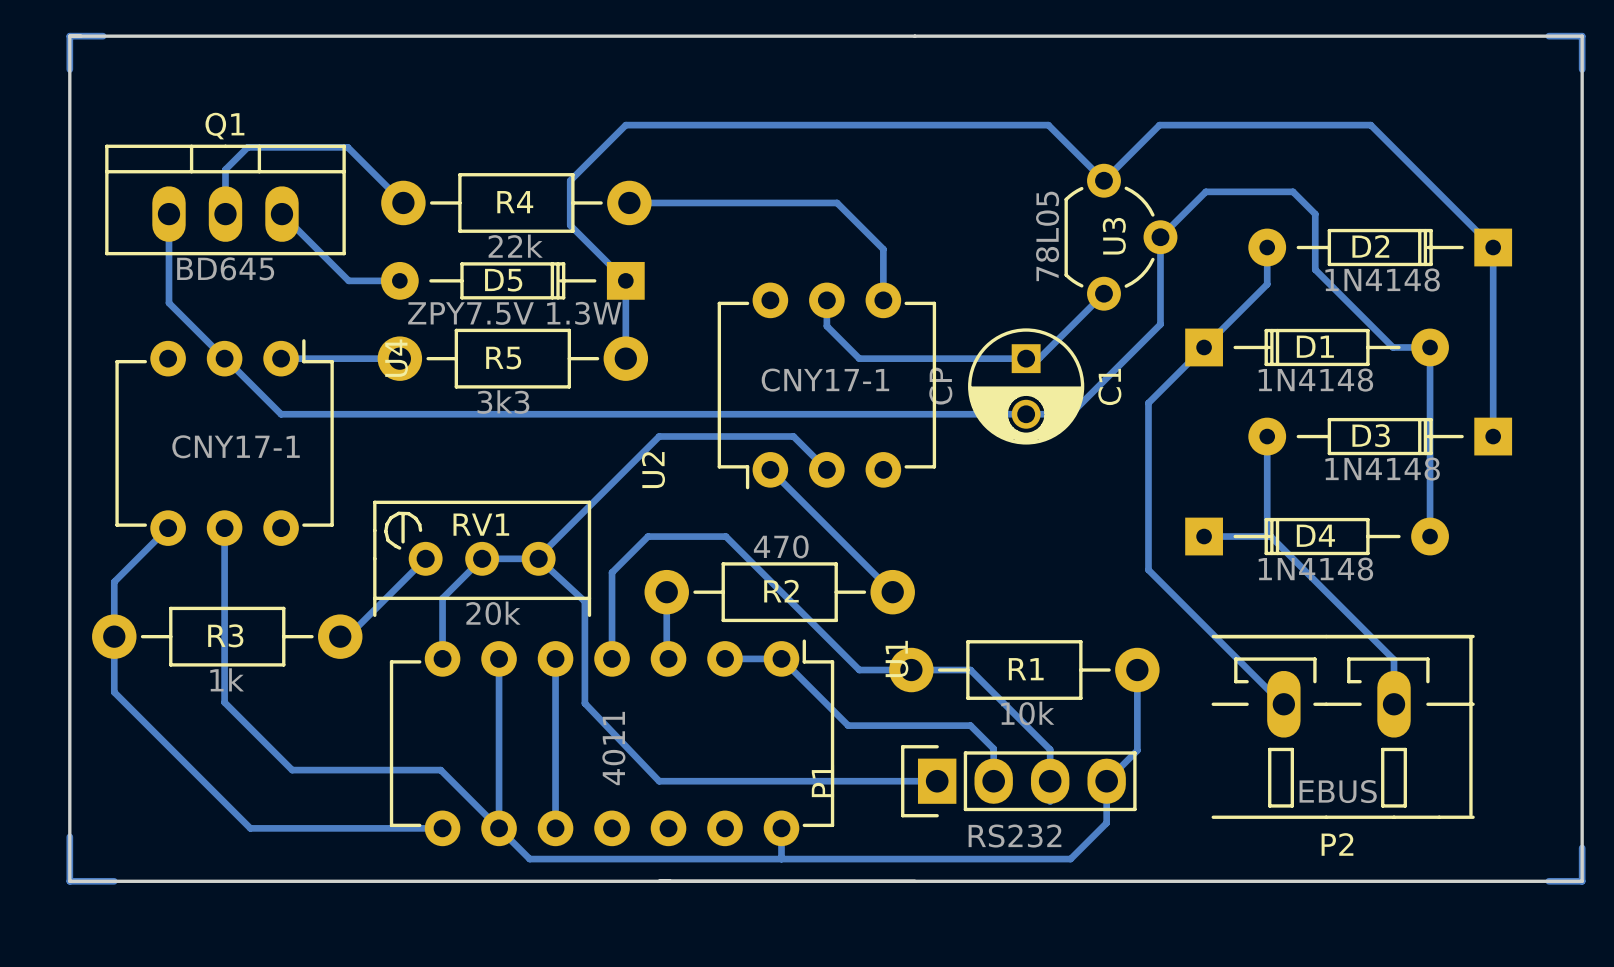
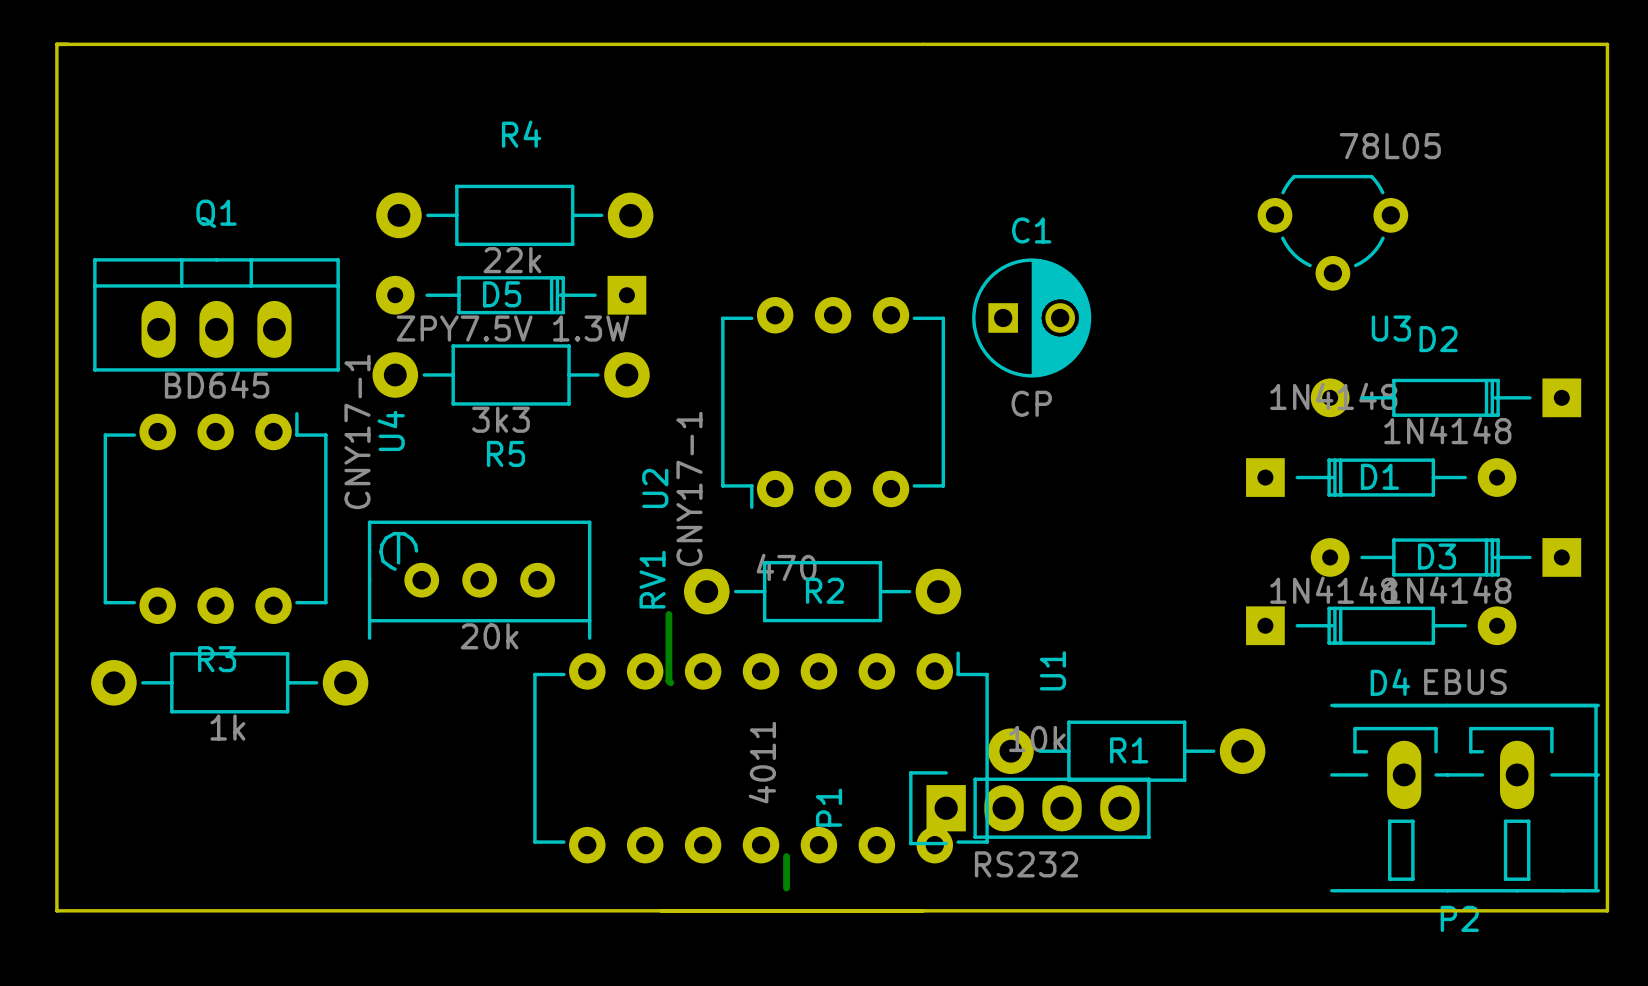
bottom track: (103, 36) (69, 36) (69, 69) -> none
bottom track: (1548, 36) (1582, 36) (1582, 69) -> none
Q1 name position: Q1 (224, 126) -> Q1 (216, 213)
Q1 position: (225, 199) -> (216, 314)
bottom track: (403, 202) (347, 147) (247, 147) (225, 169) (225, 214) -> none
R4 name position: R4 (515, 202) -> R4 (521, 134)
bottom track: (629, 202) (837, 202) (883, 249) (883, 300) -> none
bottom track: (169, 214) (169, 303) (281, 414) (1070, 414) (1160, 324) (1160, 237) (1205, 191) (1293, 191) (1315, 214) (1315, 269) (1393, 347) (1430, 347) (1430, 536) -> none
bottom track: (281, 214) (348, 280) (399, 280) -> none
U3 value position: 78L05 (1047, 236) -> 78L05 (1390, 146)
U3 name position: U3 (1114, 236) -> U3 (1391, 328)
U3 rotation: 0° (1120, 237) -> 90° clockwise (1332, 232)
U3 position: (1120, 237) -> (1332, 232)
D2 name position: D2 (1370, 246) -> D2 (1438, 339)
bottom track: (1267, 247) (1267, 284) (1148, 403) (1148, 569) (1283, 704) -> none
D2 position: (1380, 247) -> (1445, 397)
bottom track: (1103, 293) (1039, 358) (859, 358) (826, 326) (826, 300) -> none
D1 position: (1317, 347) -> (1381, 477)
bottom track: (281, 358) (399, 358) -> none
R5 name position: R5 (503, 358) -> R5 (505, 453)
bottom track: (625, 358) (625, 280) (570, 225) (570, 180) (625, 125) (1048, 125) (1103, 180) (1159, 125) (1370, 125) (1493, 247) (1493, 436) -> none
U2 value rotation: 0° (825, 380) -> 90° counterclockwise (689, 488)
C1 rotation: 0° (1026, 386) -> 90° counterclockwise (1031, 317)
C1 position: (1026, 386) -> (1031, 317)
bottom track: (1267, 436) (1267, 533) (1394, 659) (1394, 704) -> none
D3 position: (1380, 436) -> (1445, 557)
U4 position: (224, 442) -> (215, 518)
U4 value rotation: 0° (236, 446) -> 90° counterclockwise (357, 431)
bottom track: (770, 469) (892, 592) -> none
bottom track: (826, 469) (793, 436) (659, 436) (536, 558) -> none
RV1 name rotation: 0° (481, 524) -> 90° counterclockwise (652, 579)
RV1 name position: RV1 (481, 524) -> RV1 (652, 579)
bottom track: (168, 528) (114, 581) (114, 692) (250, 828) (442, 828) -> none
bottom track: (224, 528) (224, 702) (292, 770) (440, 770) (529, 859) (1070, 859) (1106, 823) (1106, 781) -> none
D4 name position: D4 (1315, 535) -> D4 (1390, 682)
bottom track: (1204, 536) (1270, 536) -> none
D4 position: (1317, 536) -> (1381, 625)
bottom track: (425, 558) (347, 636) (340, 636) -> none
R2 position: (779, 592) -> (822, 591)
R3 position: (227, 636) -> (229, 682)
bottom track: (442, 658) (442, 598) (482, 558) (538, 558) (584, 601) (584, 703) (659, 781) (937, 781) -> none
bottom track: (499, 658) (499, 828) -> none
bottom track: (555, 658) (555, 828) -> none
bottom track: (612, 658) (612, 572) (648, 536) (725, 536) (859, 670) (970, 670) (1050, 749) (1050, 801) -> none
bottom track: (725, 658) (781, 658) (848, 725) (970, 725) (993, 748) (993, 781) -> none
R1 position: (1024, 670) -> (1126, 751)
bottom track: (1137, 670) (1137, 750) (1106, 781) -> none
P2 position: (1343, 726) -> (1465, 798)
U1 position: (612, 742) -> (761, 757)
P2 value position: EBUS (1338, 791) -> EBUS (1465, 681)
bottom track: (69, 836) (69, 881) (114, 881) -> none
bottom track: (1582, 847) (1582, 881) (1548, 881) -> none

